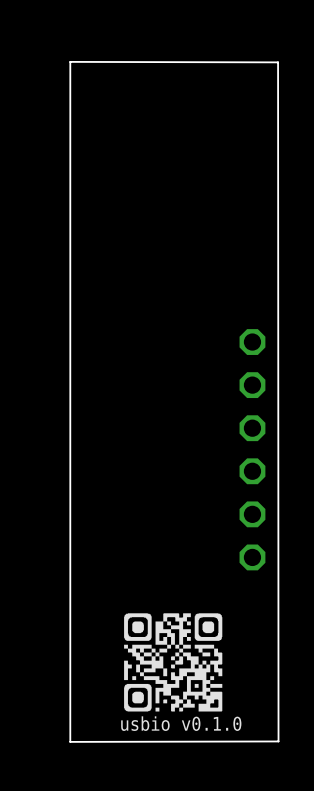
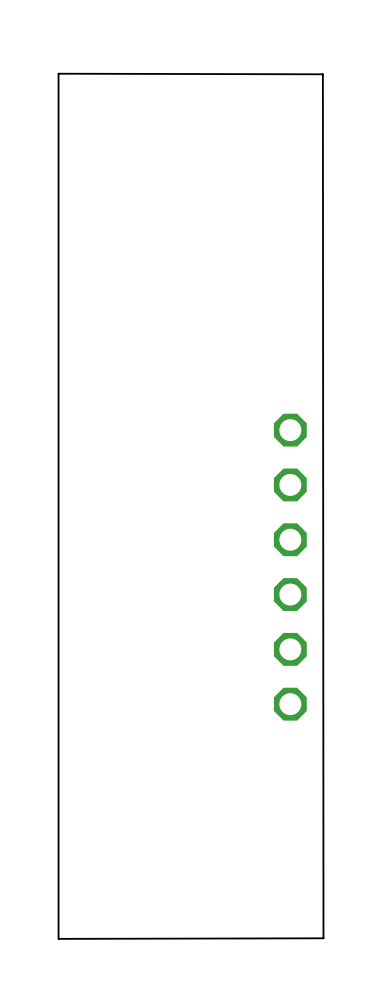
drawing: [124, 613, 223, 712] -> none
text: usbio v0.1.0 (181, 723) -> none

